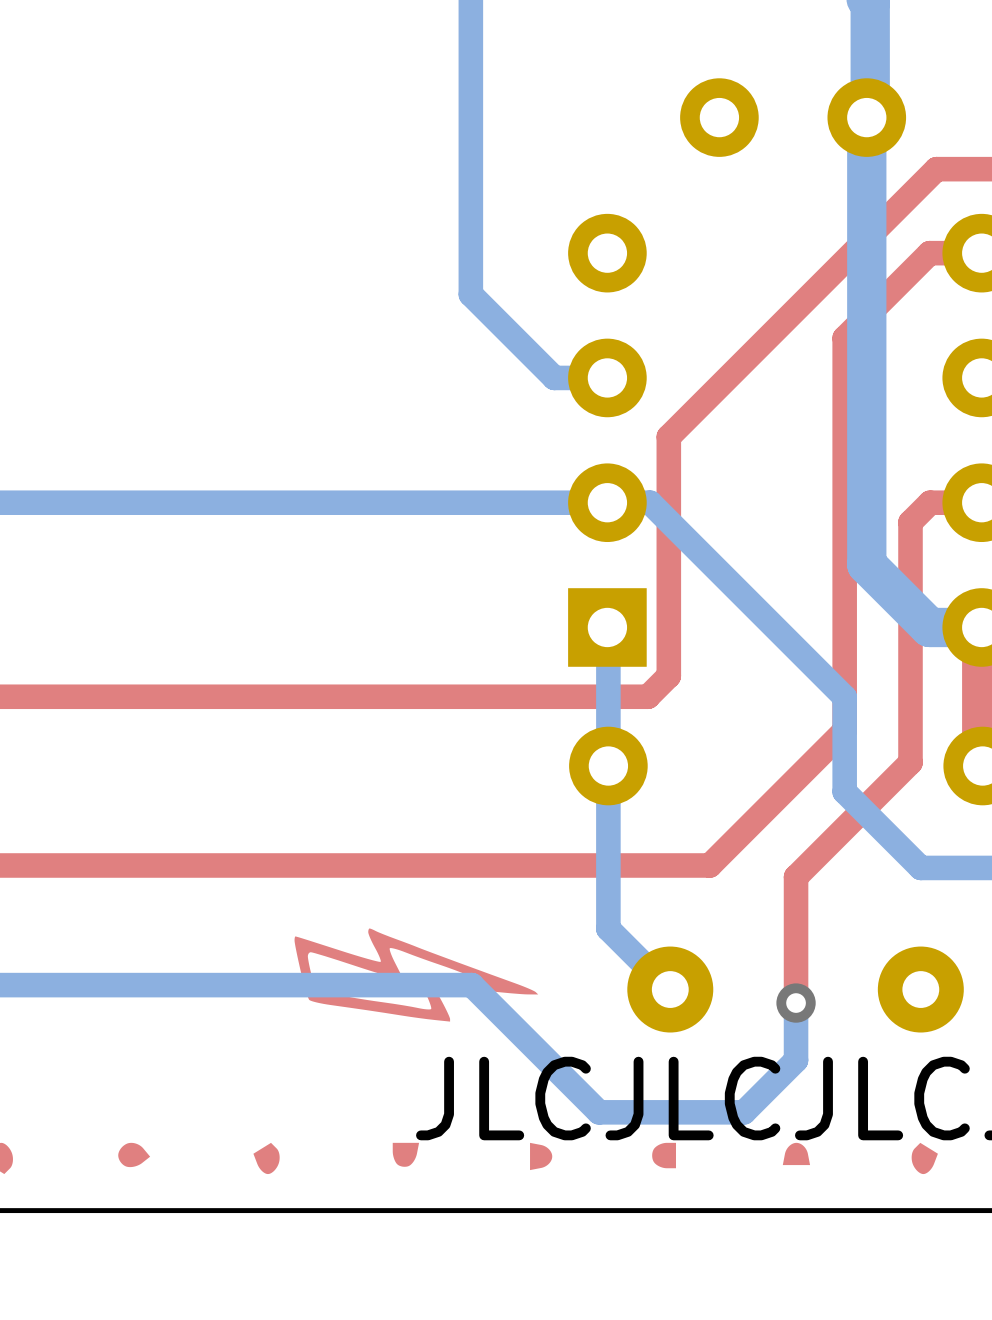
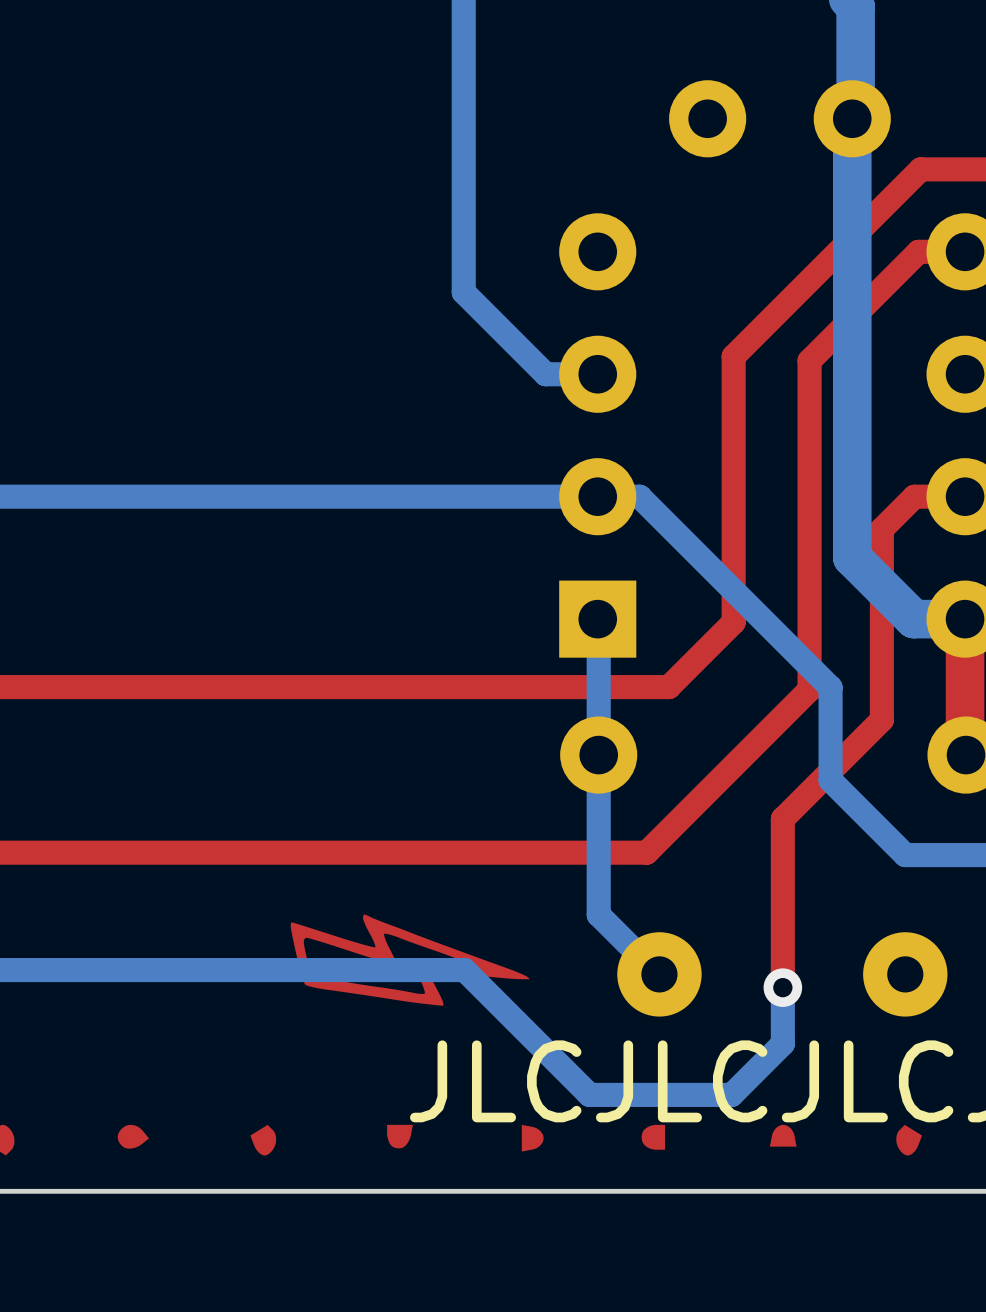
top track: (934, 253) (929, 253) (844, 338) (844, 730) (709, 865) (657, 865) -> (918, 251) (809, 360) (809, 689) (646, 852)
top track: (745, 359) (668, 436) (668, 675) (648, 696) -> (733, 356) (733, 622) (668, 687) (637, 687)
top track: (910, 522) (910, 762) (796, 877) -> (895, 515) (881, 529) (881, 719) (782, 818) (782, 864)

